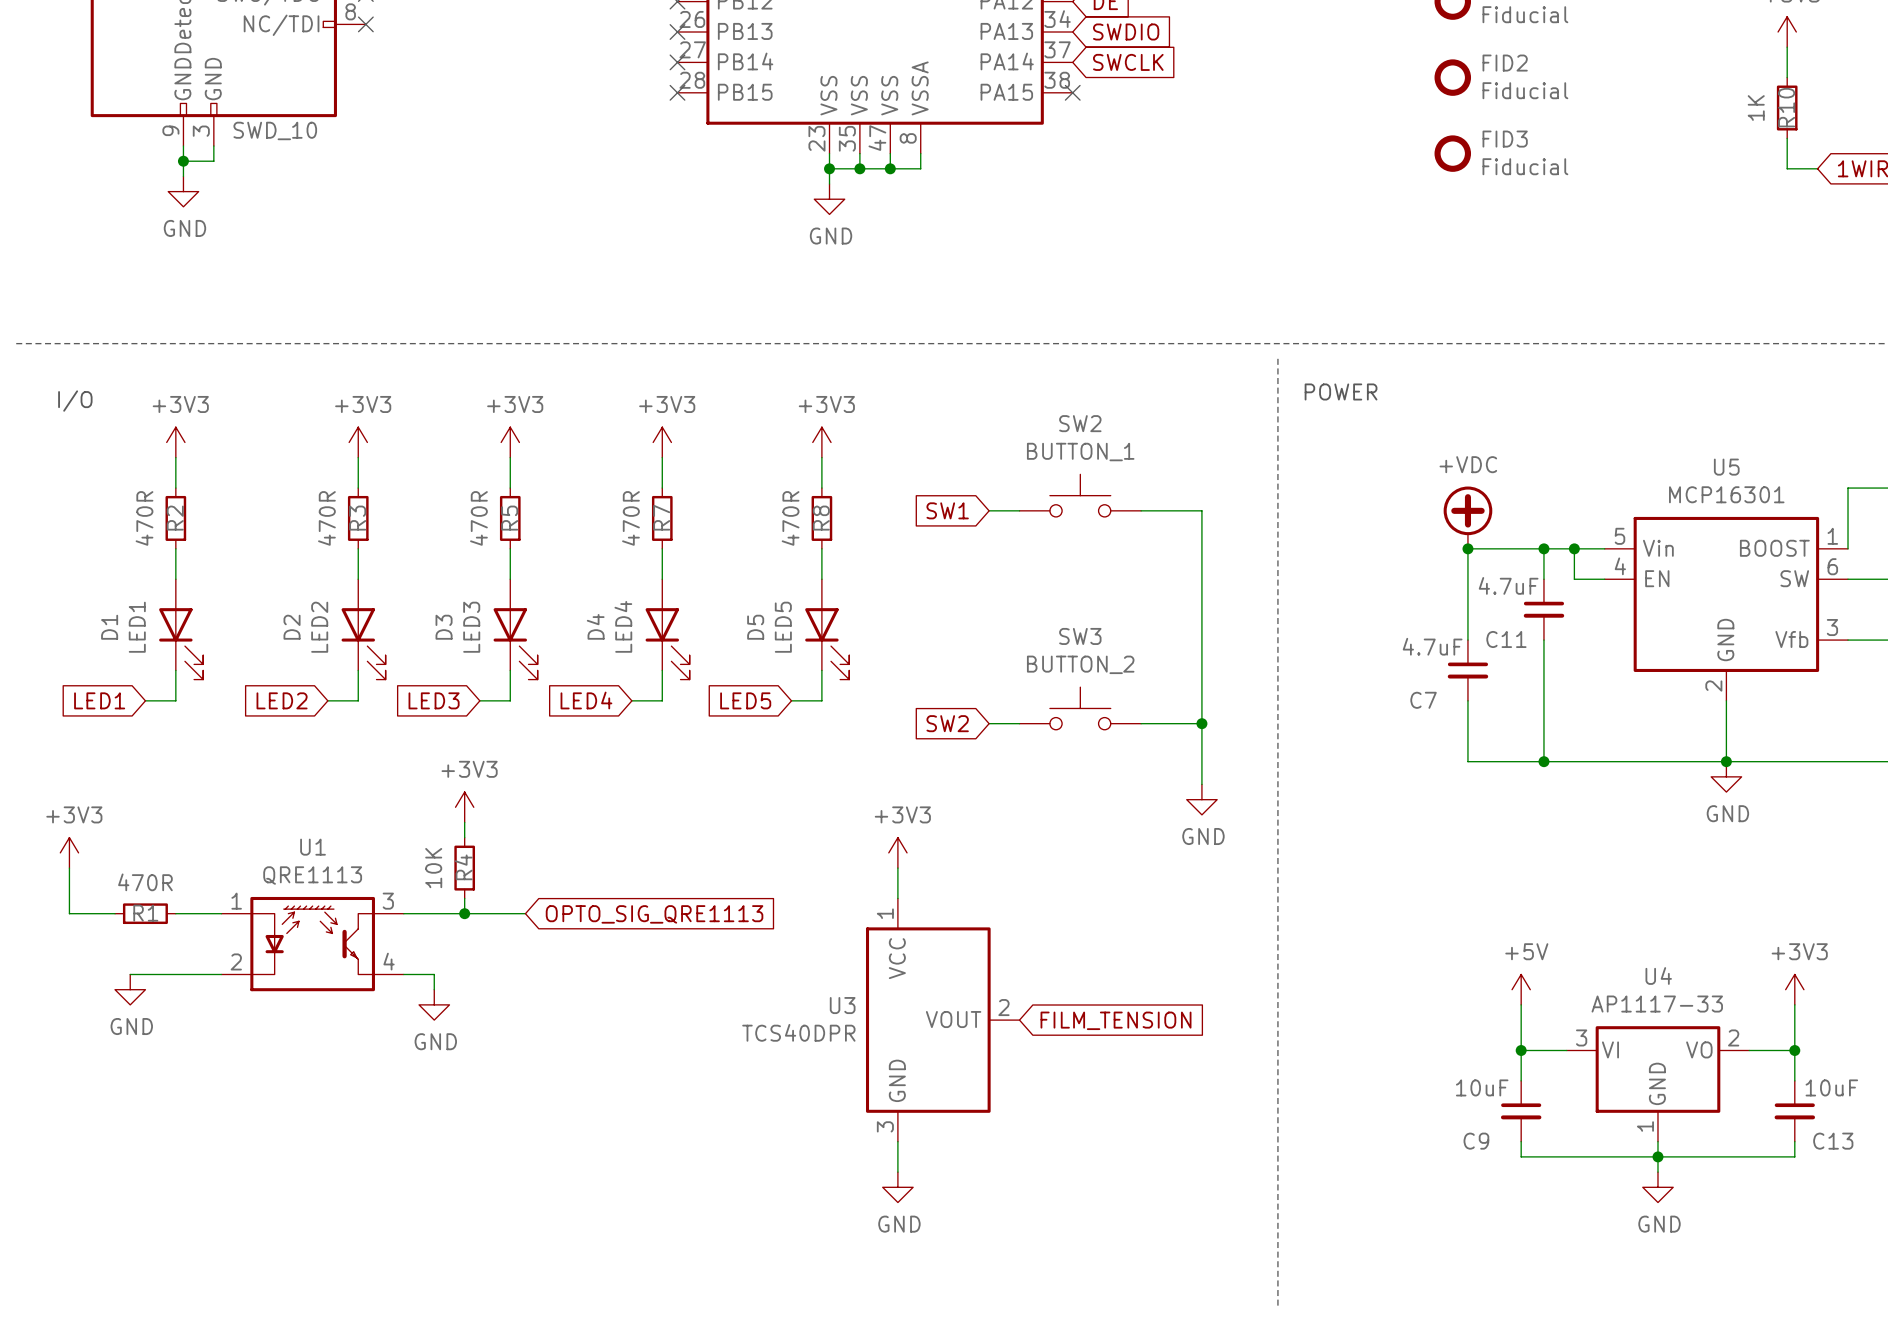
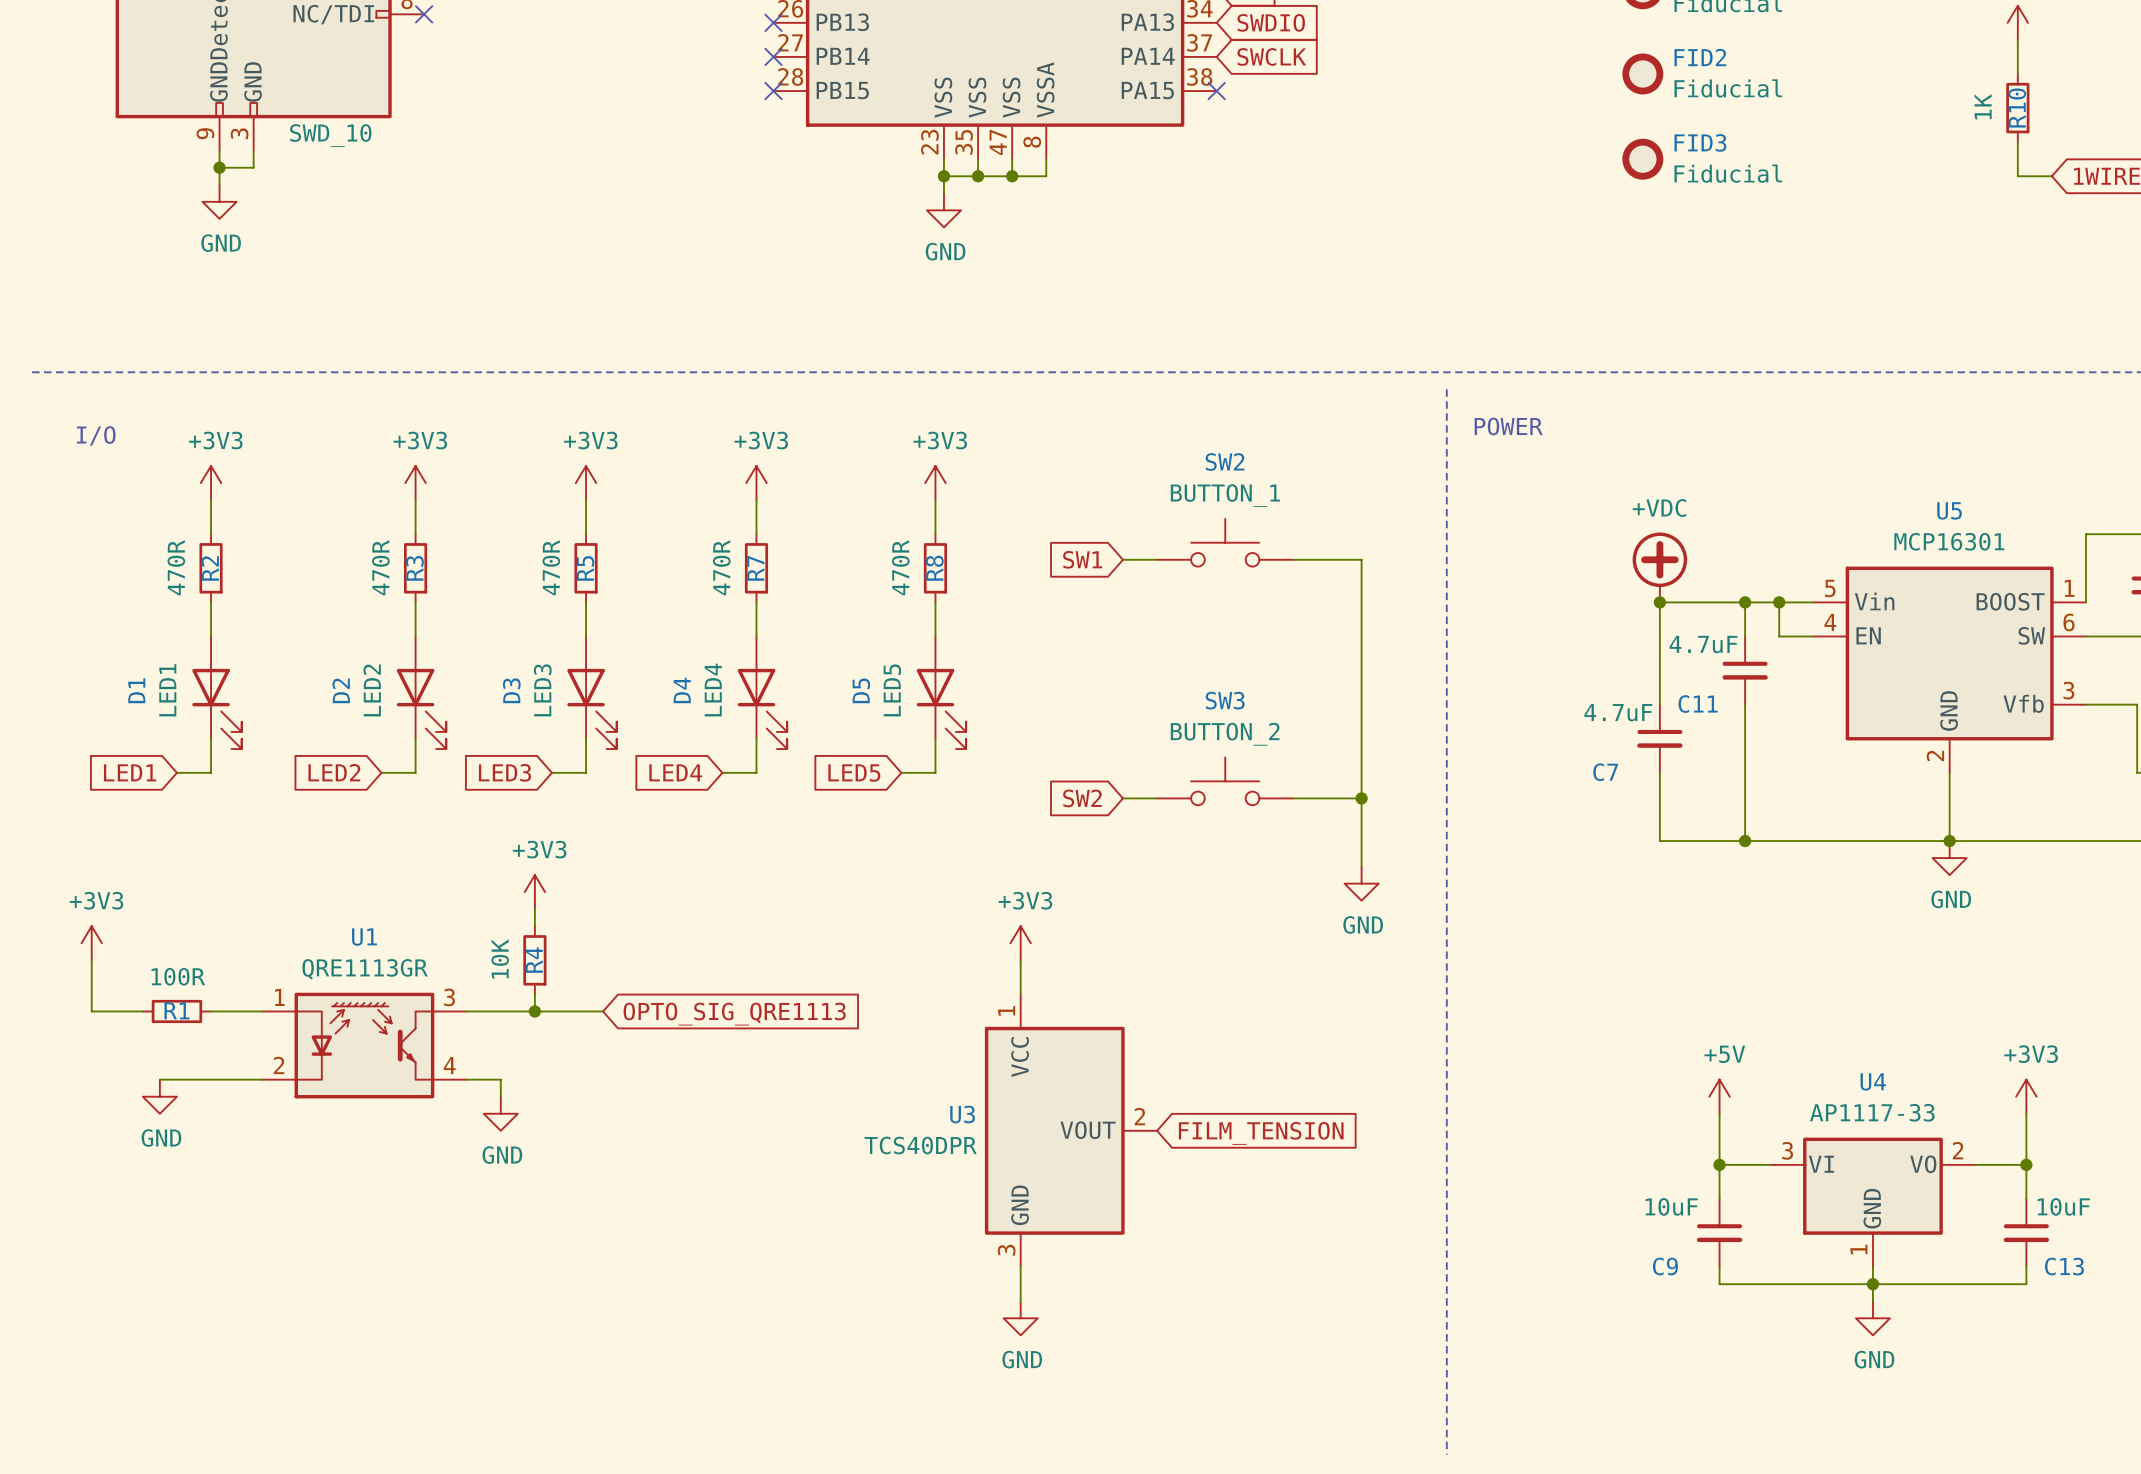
U1 value: QRE1113 (312, 875) -> QRE1113GR (365, 969)
R1 value: 470R (145, 882) -> 100R (178, 976)

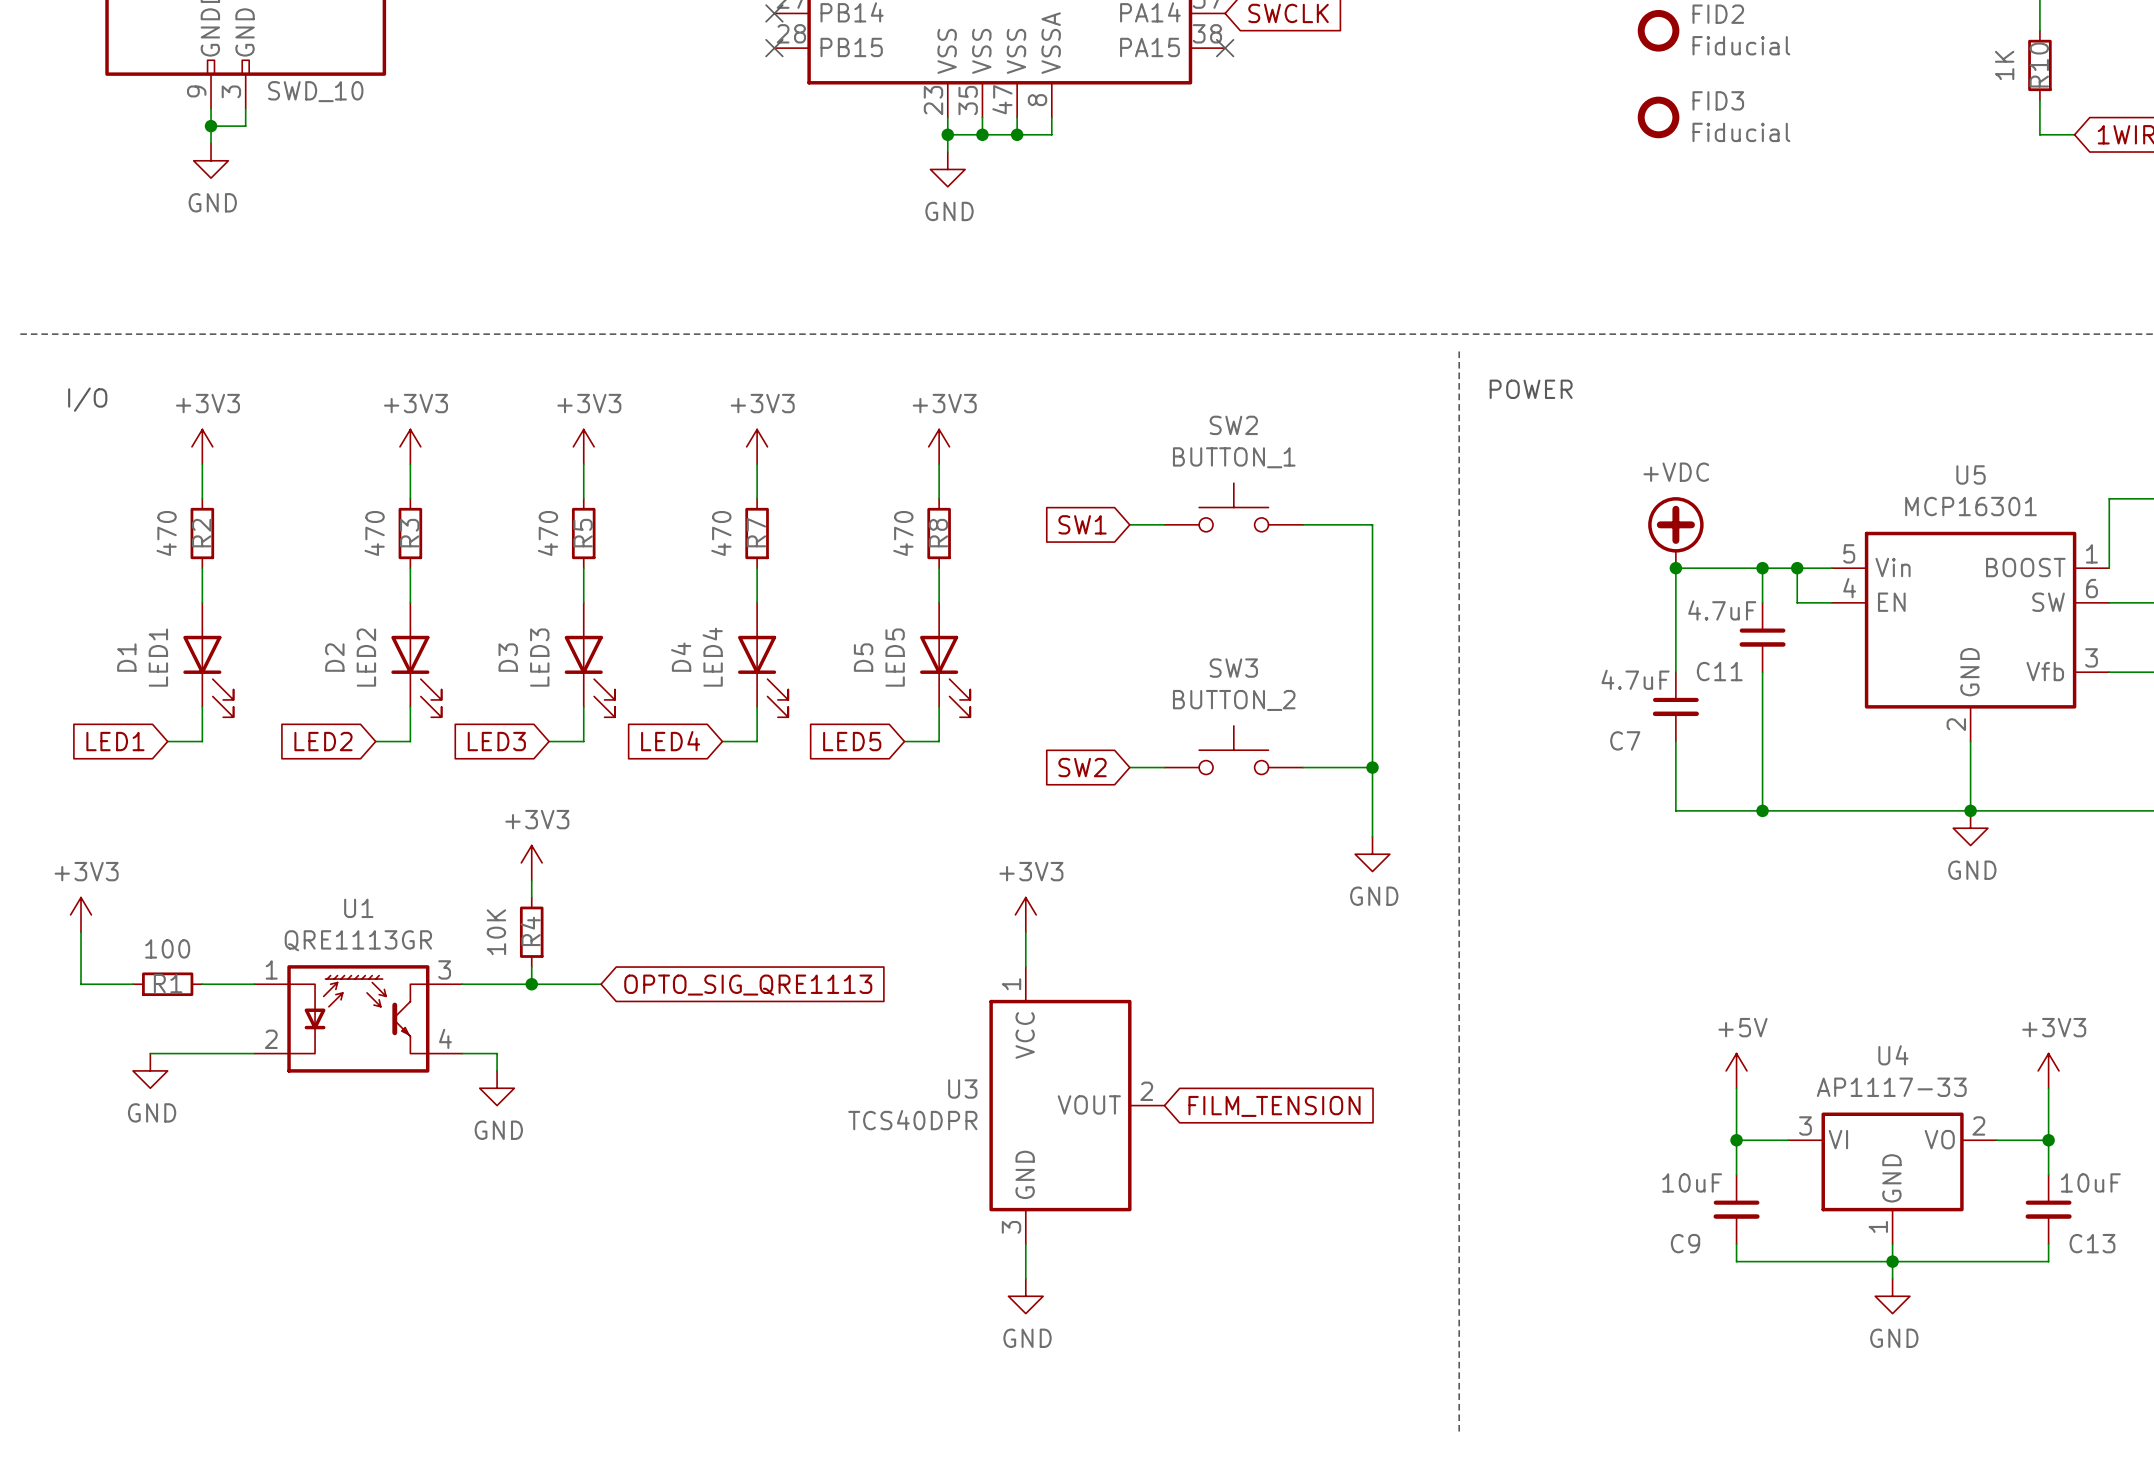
R2 value: 470R (176, 567) -> 470 (166, 533)
R3 value: 470R (380, 567) -> 470 (374, 533)
R5 value: 470R (551, 567) -> 470 (548, 533)
R7 value: 470R (721, 567) -> 470 (721, 533)
R8 value: 470R (900, 567) -> 470 (903, 533)
R1 value: 100R (178, 976) -> 100 (167, 948)

